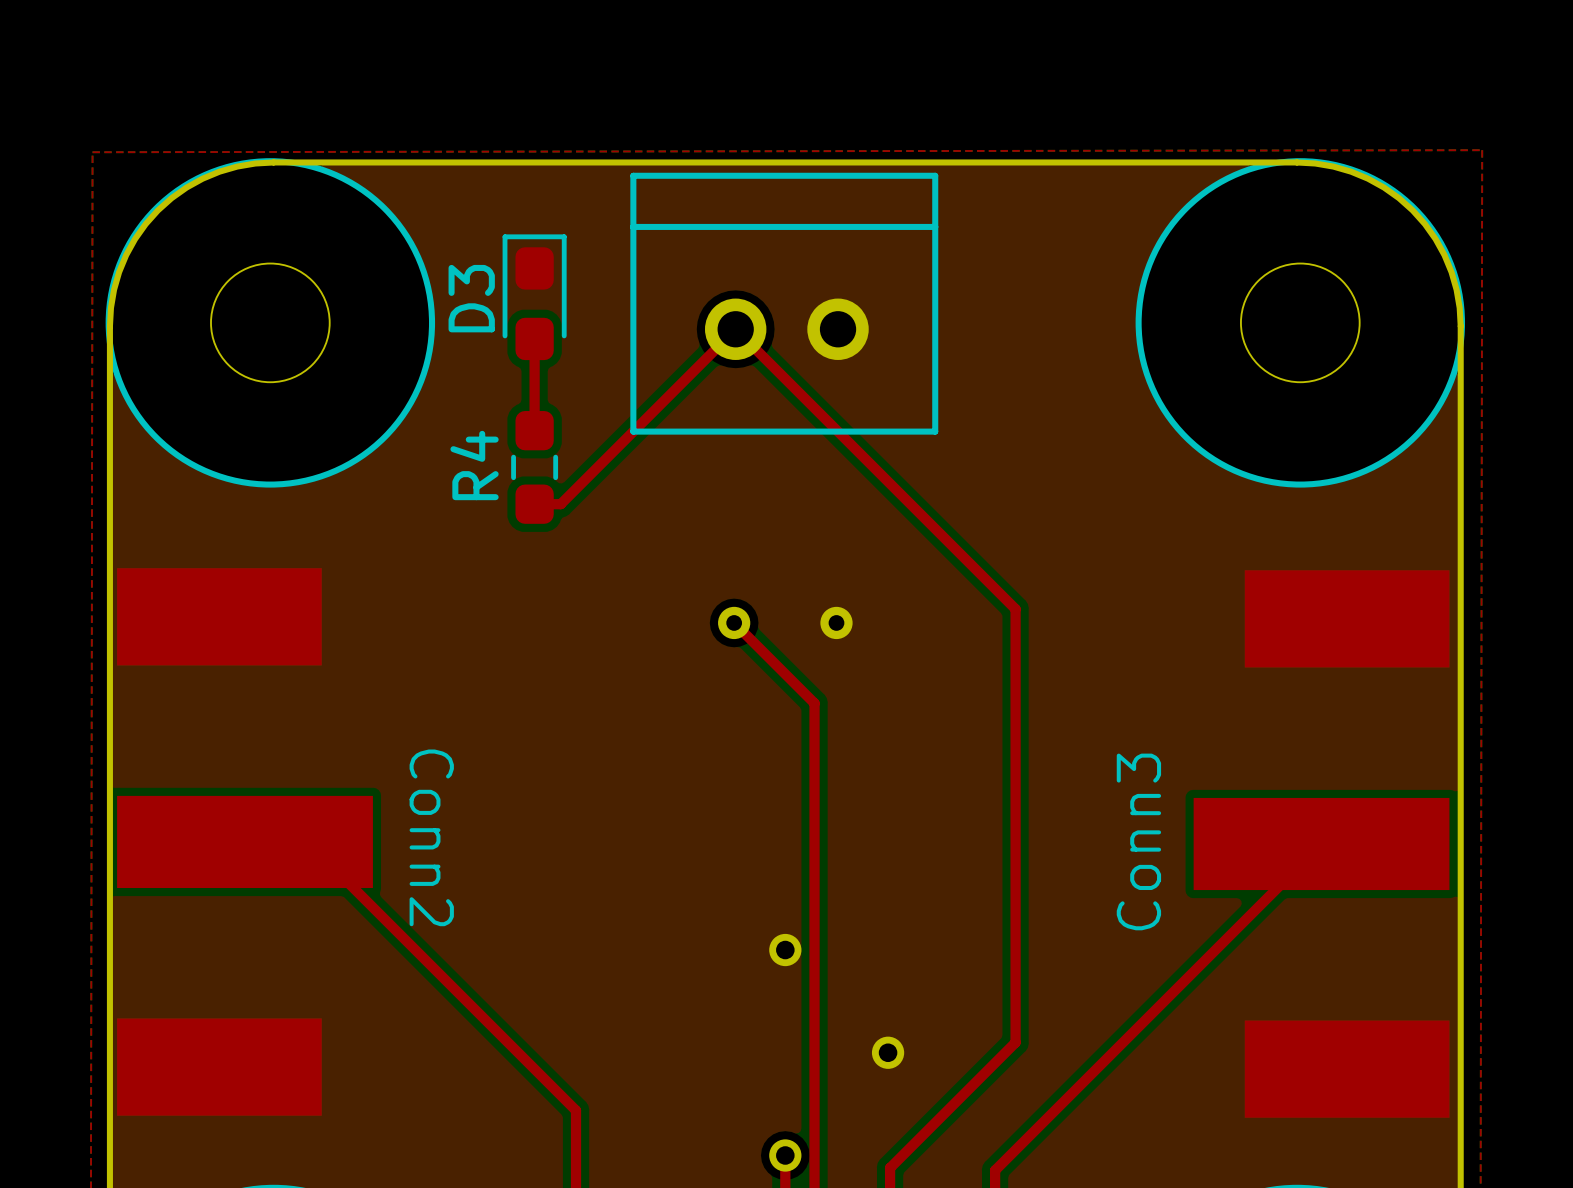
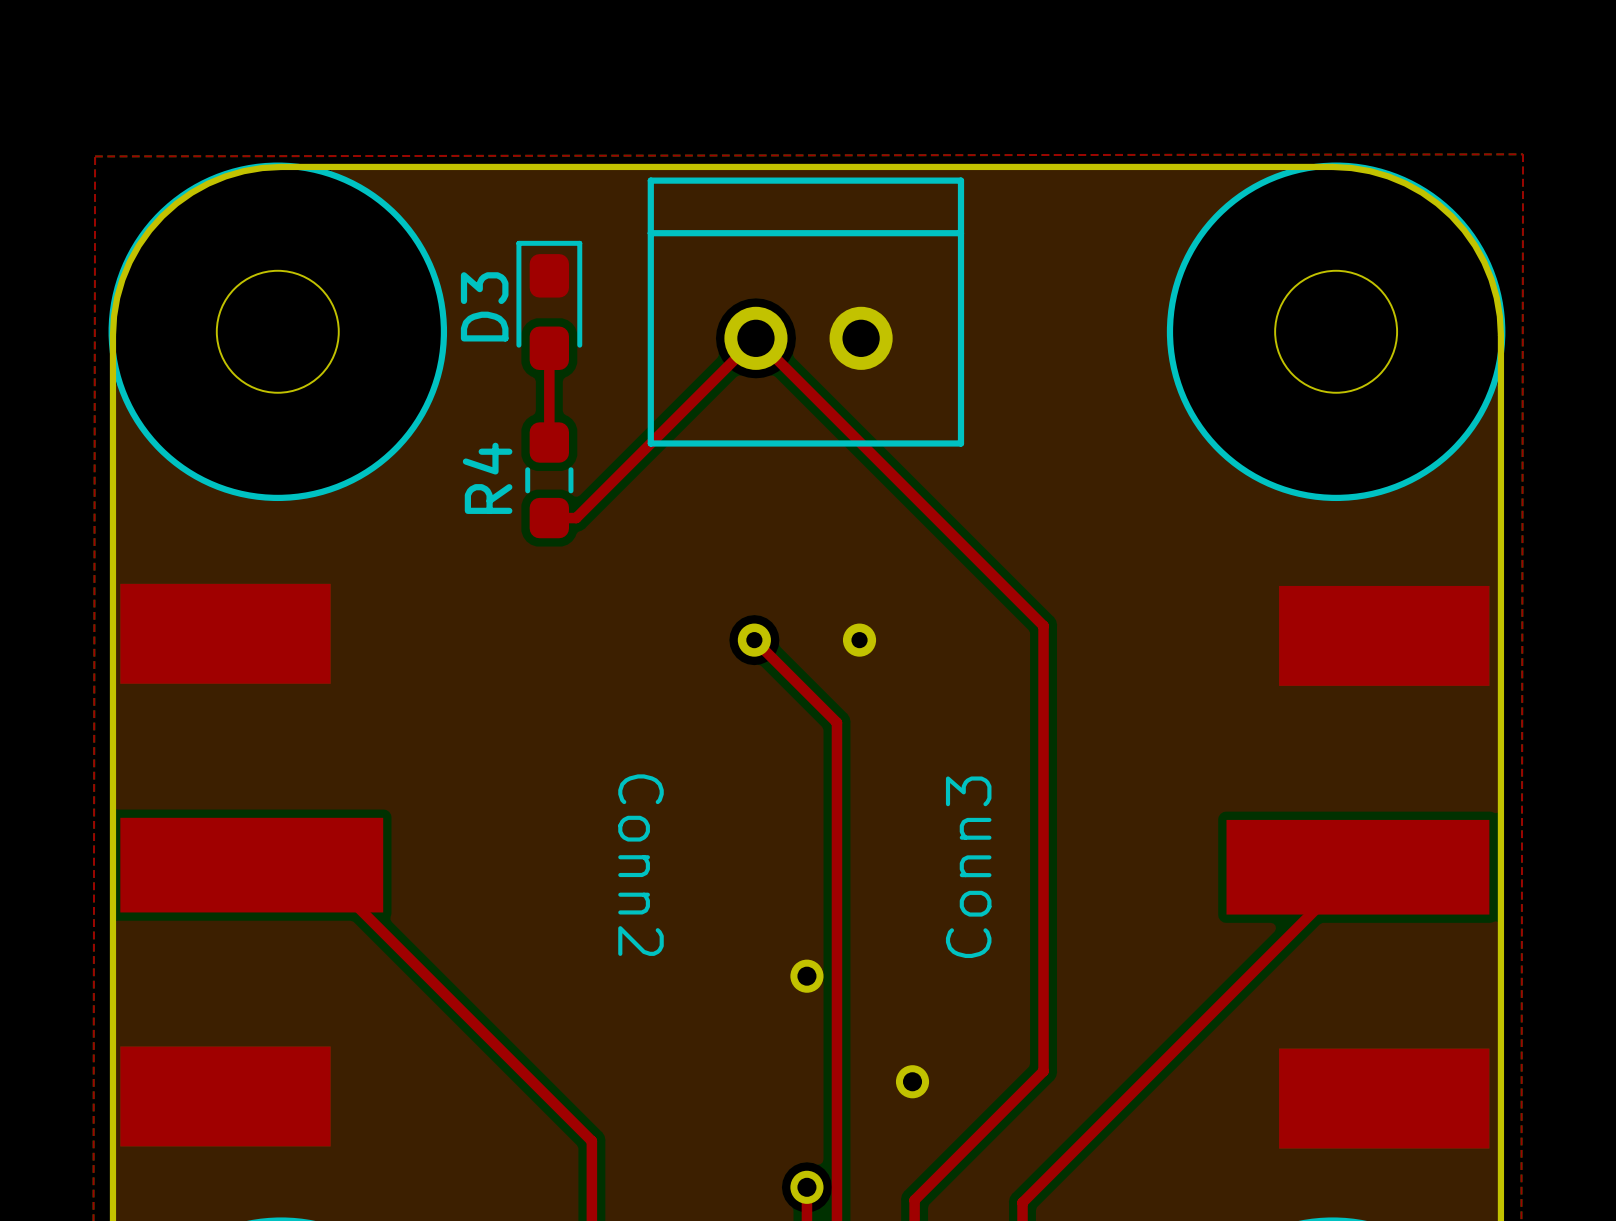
Conn2 name position: Conn2 (431, 837) -> Conn2 (641, 865)
Conn3 name position: Conn3 (1138, 841) -> Conn3 (968, 867)

